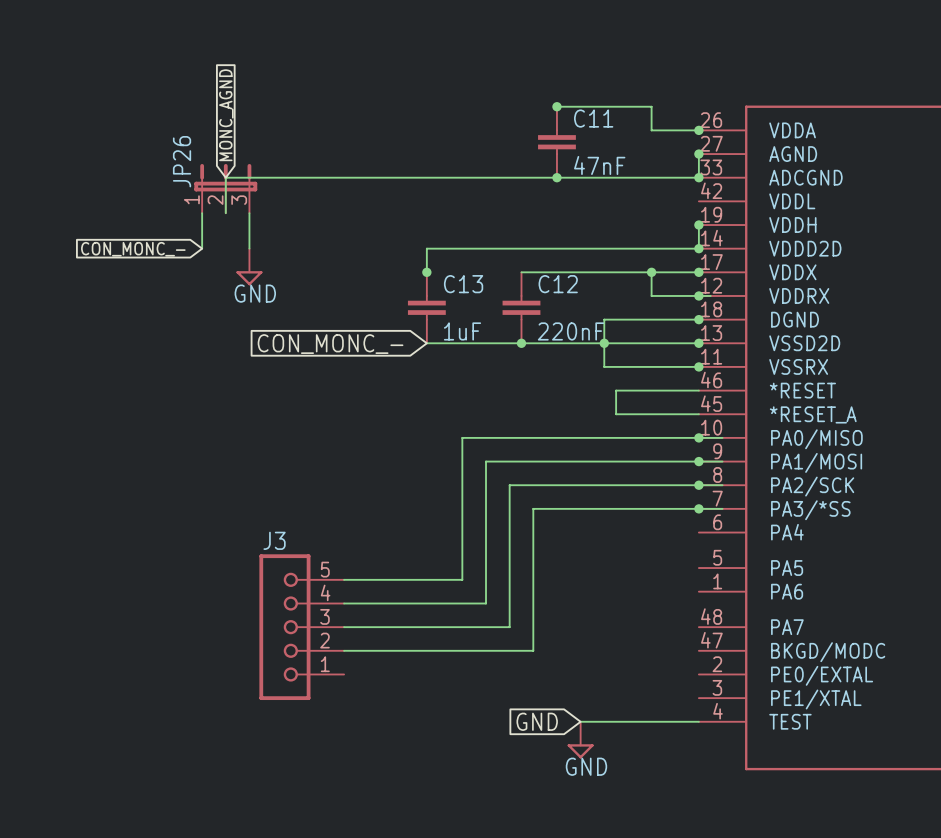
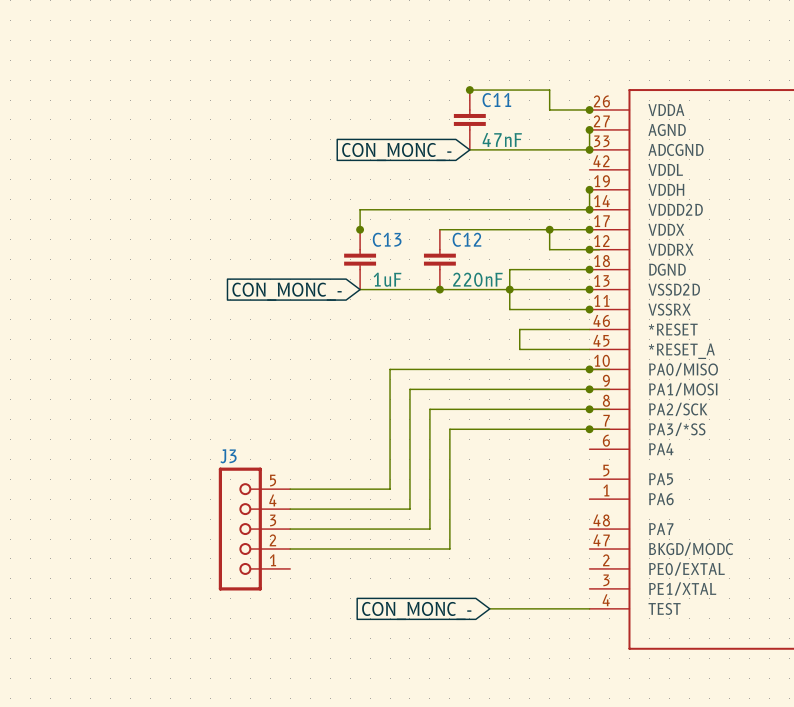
global label: MONC_AGND (226, 115) -> none
wire: (556, 177) (225, 177) (225, 213) -> none
junction: (556, 177) -> none
global label: none -> CON_MONC_- (396, 151)
JP26: (225, 188) -> none
wire: (202, 213) (202, 248) -> none
wire: (249, 213) (249, 248) -> none
global label: CON_MONC_- (133, 249) -> none
power symbol: GND (249, 267) -> none
global label: GND (537, 721) -> CON_MONC_- (416, 610)
power symbol: GND (580, 740) -> none

